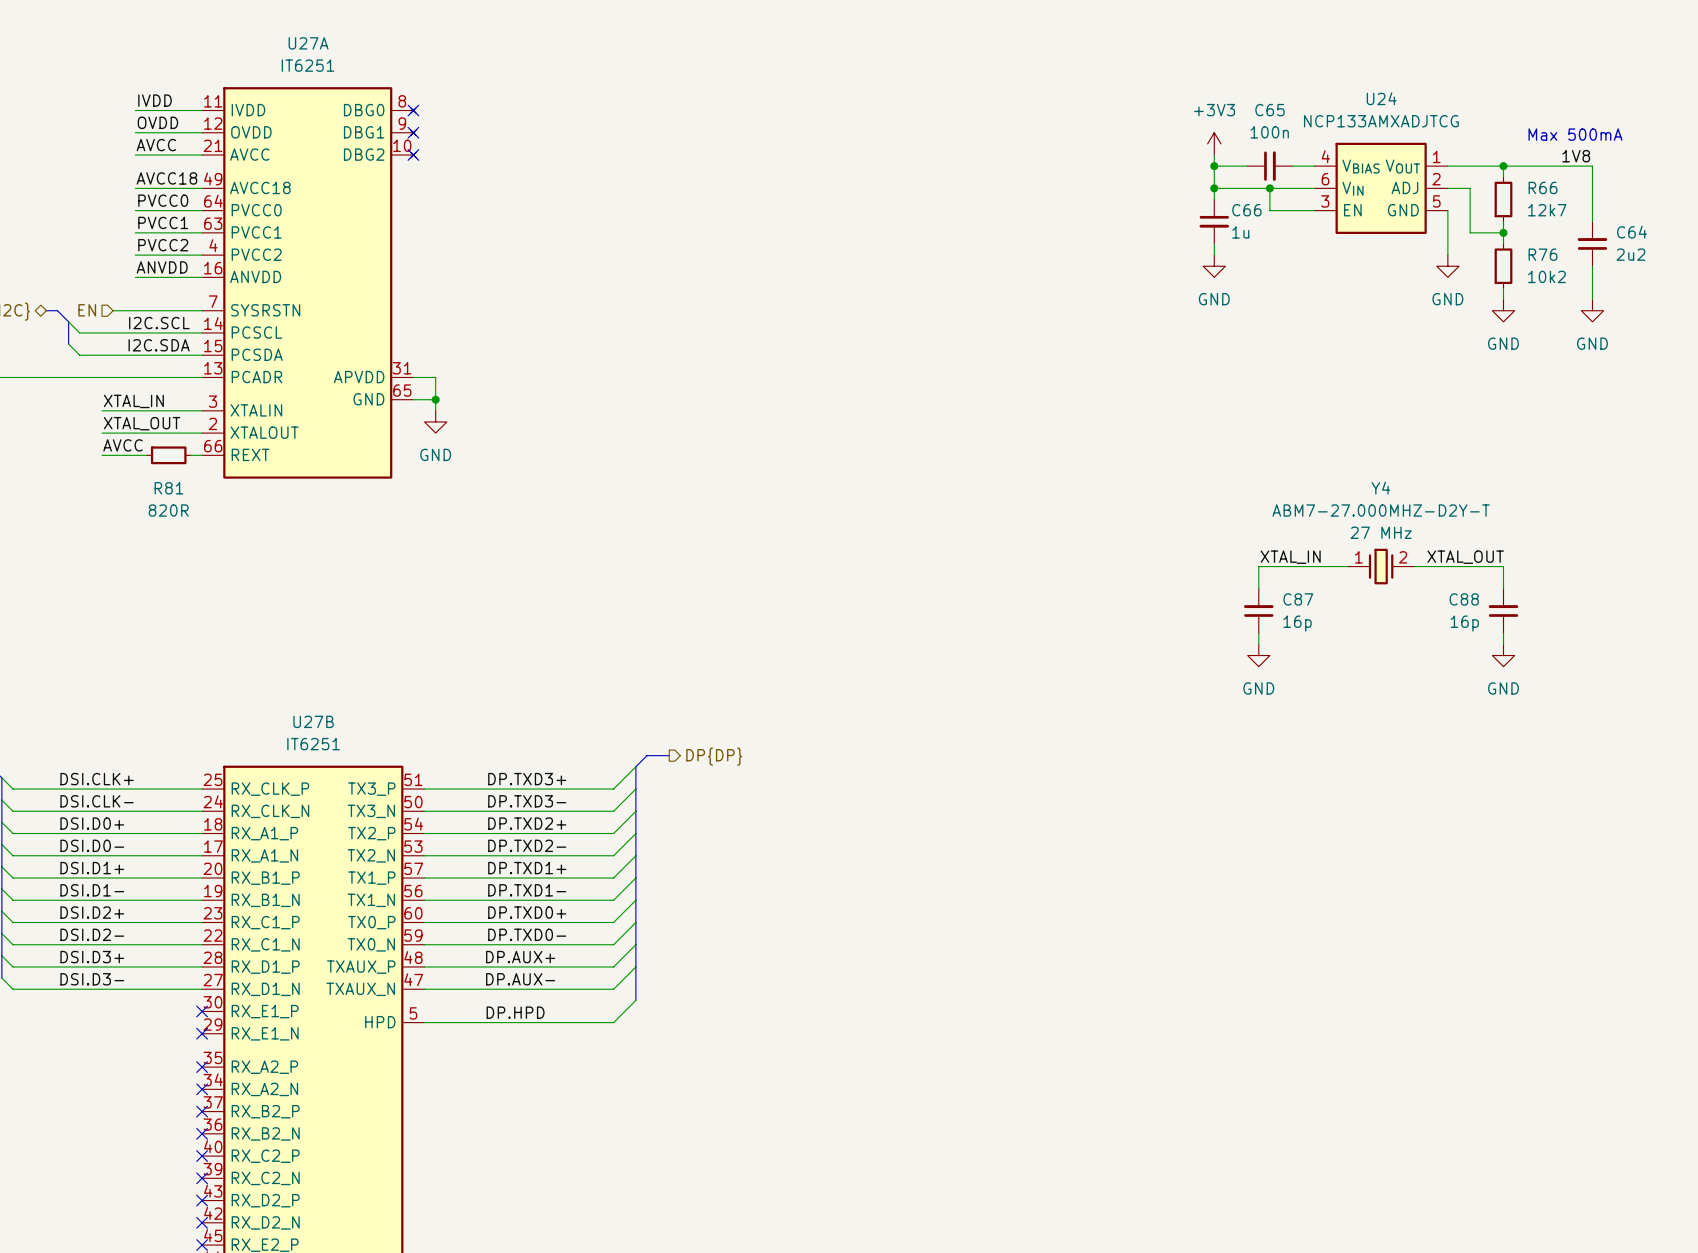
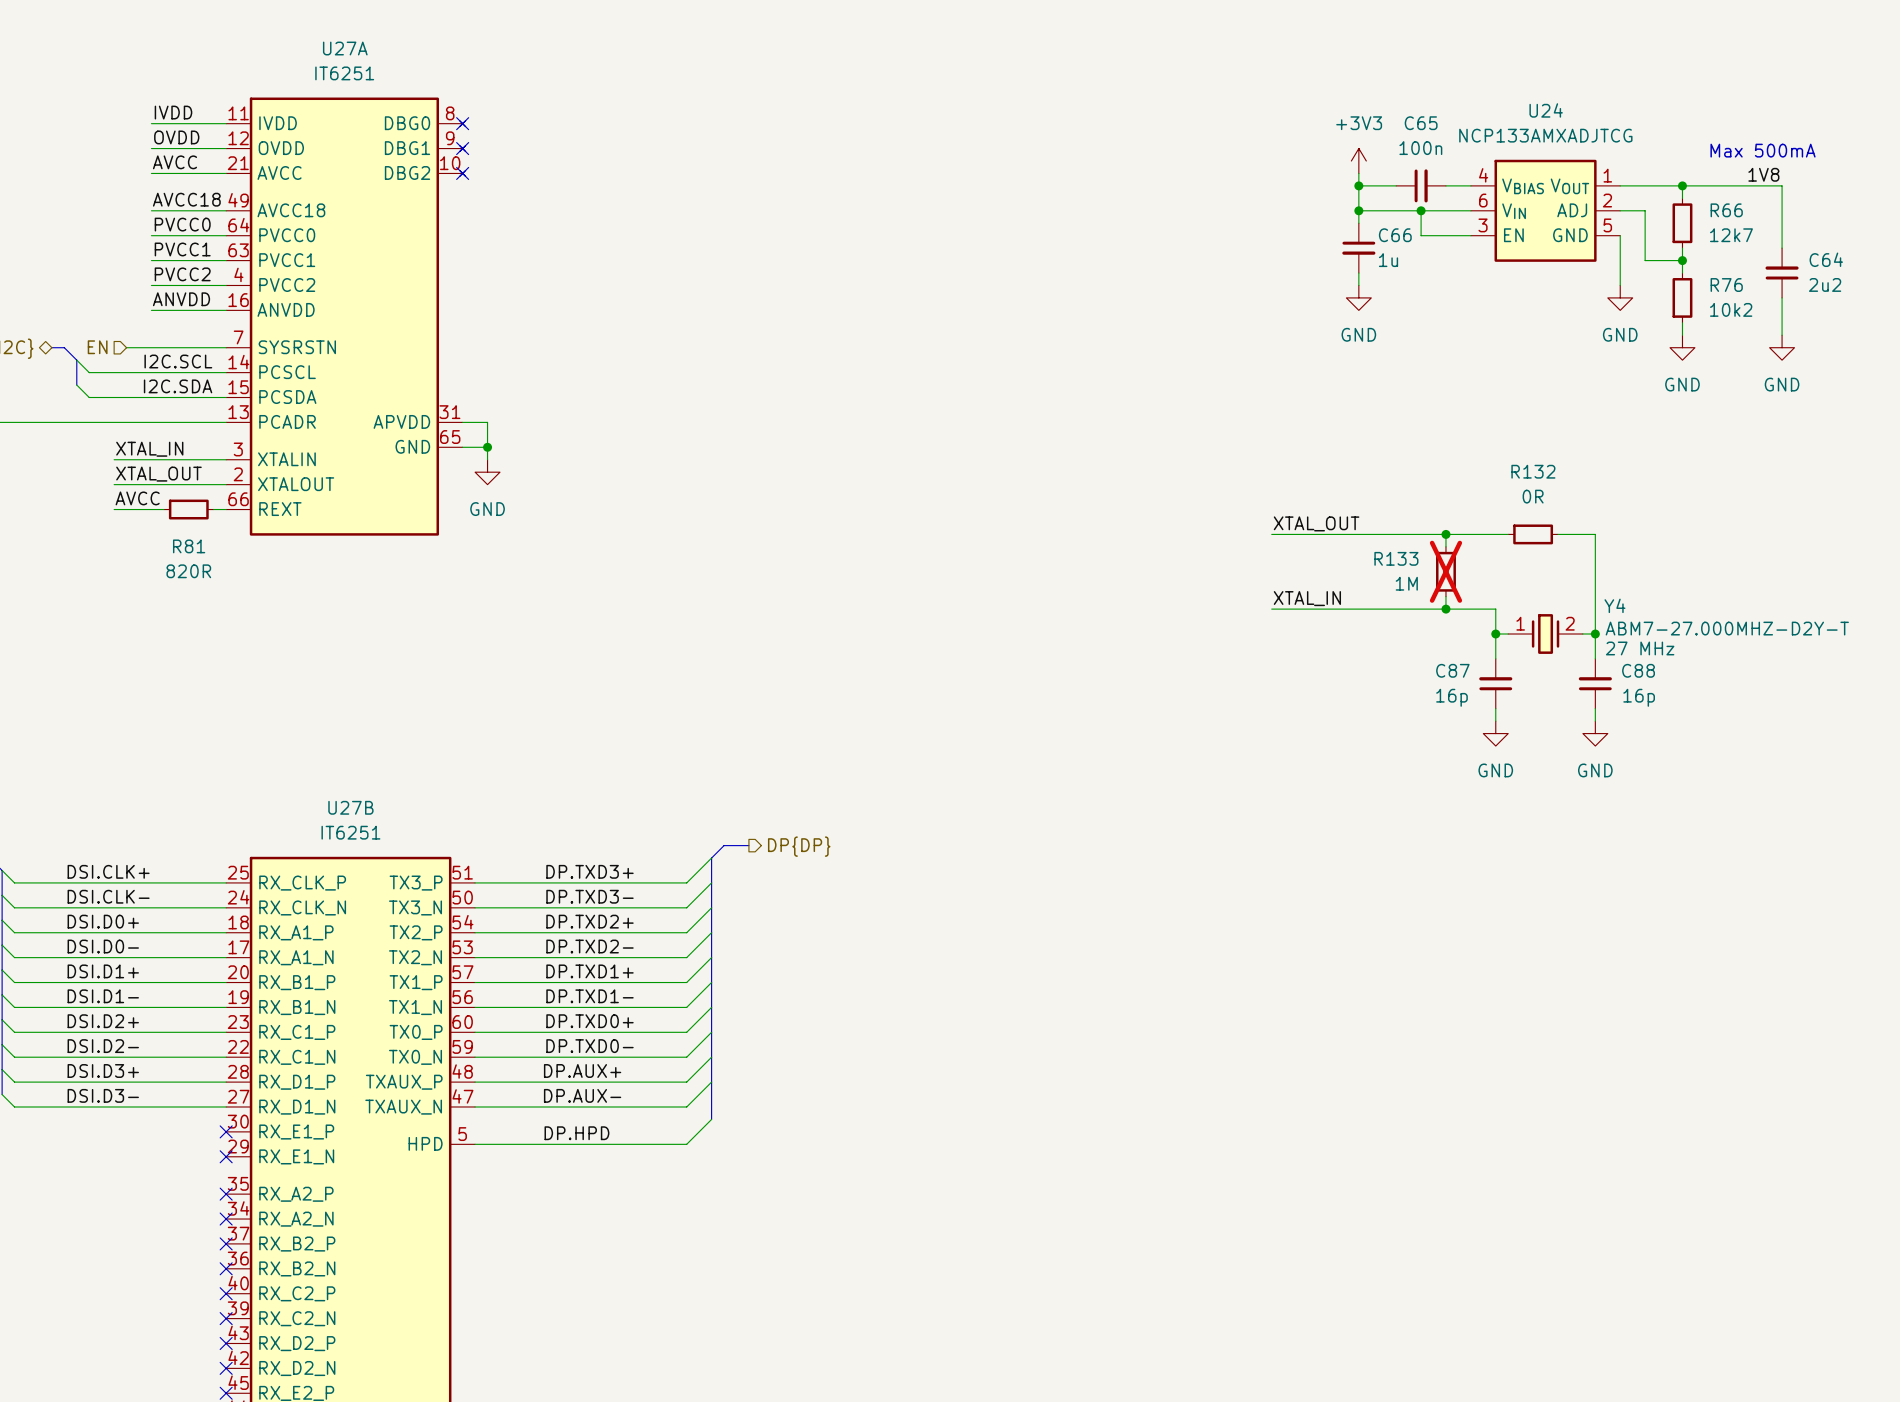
label: none -> XTAL_OUT (1316, 523)
wire: none -> (1271, 534) (1508, 534)
wire: none -> (1445, 534) (1445, 546)
junction: none -> (1445, 534)
R132: none -> (1533, 534)
wire: none -> (1558, 534) (1595, 534) (1595, 658)
Y4 name position: Y4 (1380, 488) -> Y4 (1614, 605)
R133: none -> (1445, 571)
Y4 text position: ABM7-27.000MHZ-D2Y-T (1381, 510) -> ABM7-27.000MHZ-D2Y-T (1727, 628)
Y4 text position: 27 MHz (1381, 532) -> 27 MHz (1640, 648)
wire: none -> (1445, 596) (1445, 609)
wire: none -> (1271, 609) (1495, 609) (1495, 658)
junction: none -> (1445, 609)
label position: XTAL_IN (1290, 557) -> XTAL_IN (1307, 598)
label: XTAL_OUT (1465, 557) -> none
wire: (1336, 566) (1258, 566) (1258, 588) -> none
junction: none -> (1495, 634)
wire: (1425, 566) (1503, 566) (1503, 588) -> none
junction: none -> (1595, 634)
C87 position: (1258, 611) -> (1495, 683)
C88 position: (1503, 611) -> (1595, 683)
wire: (1258, 633) (1258, 644) -> (1495, 708) (1495, 721)
wire: (1503, 633) (1503, 644) -> (1595, 708) (1595, 721)
power symbol position: GND (1258, 655) -> GND (1495, 733)
power symbol position: GND (1503, 655) -> GND (1595, 733)

